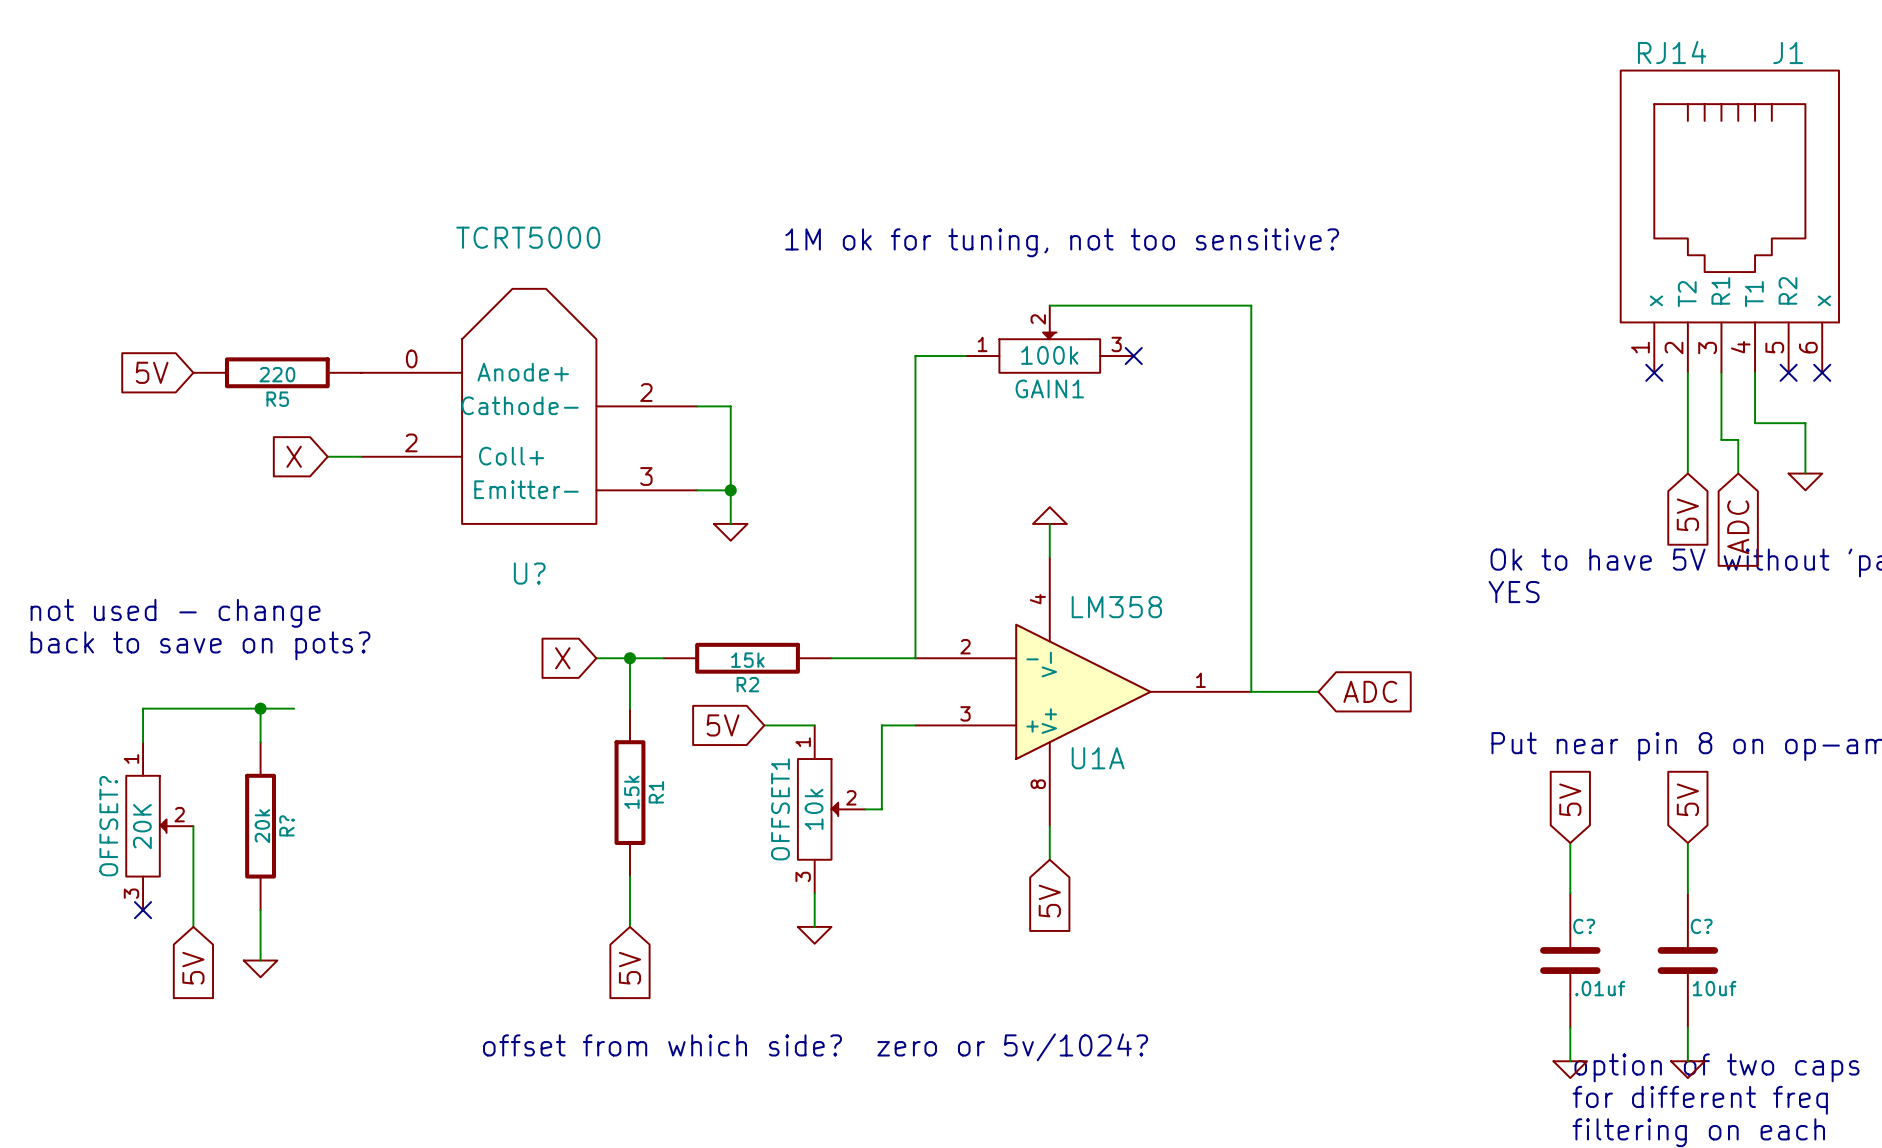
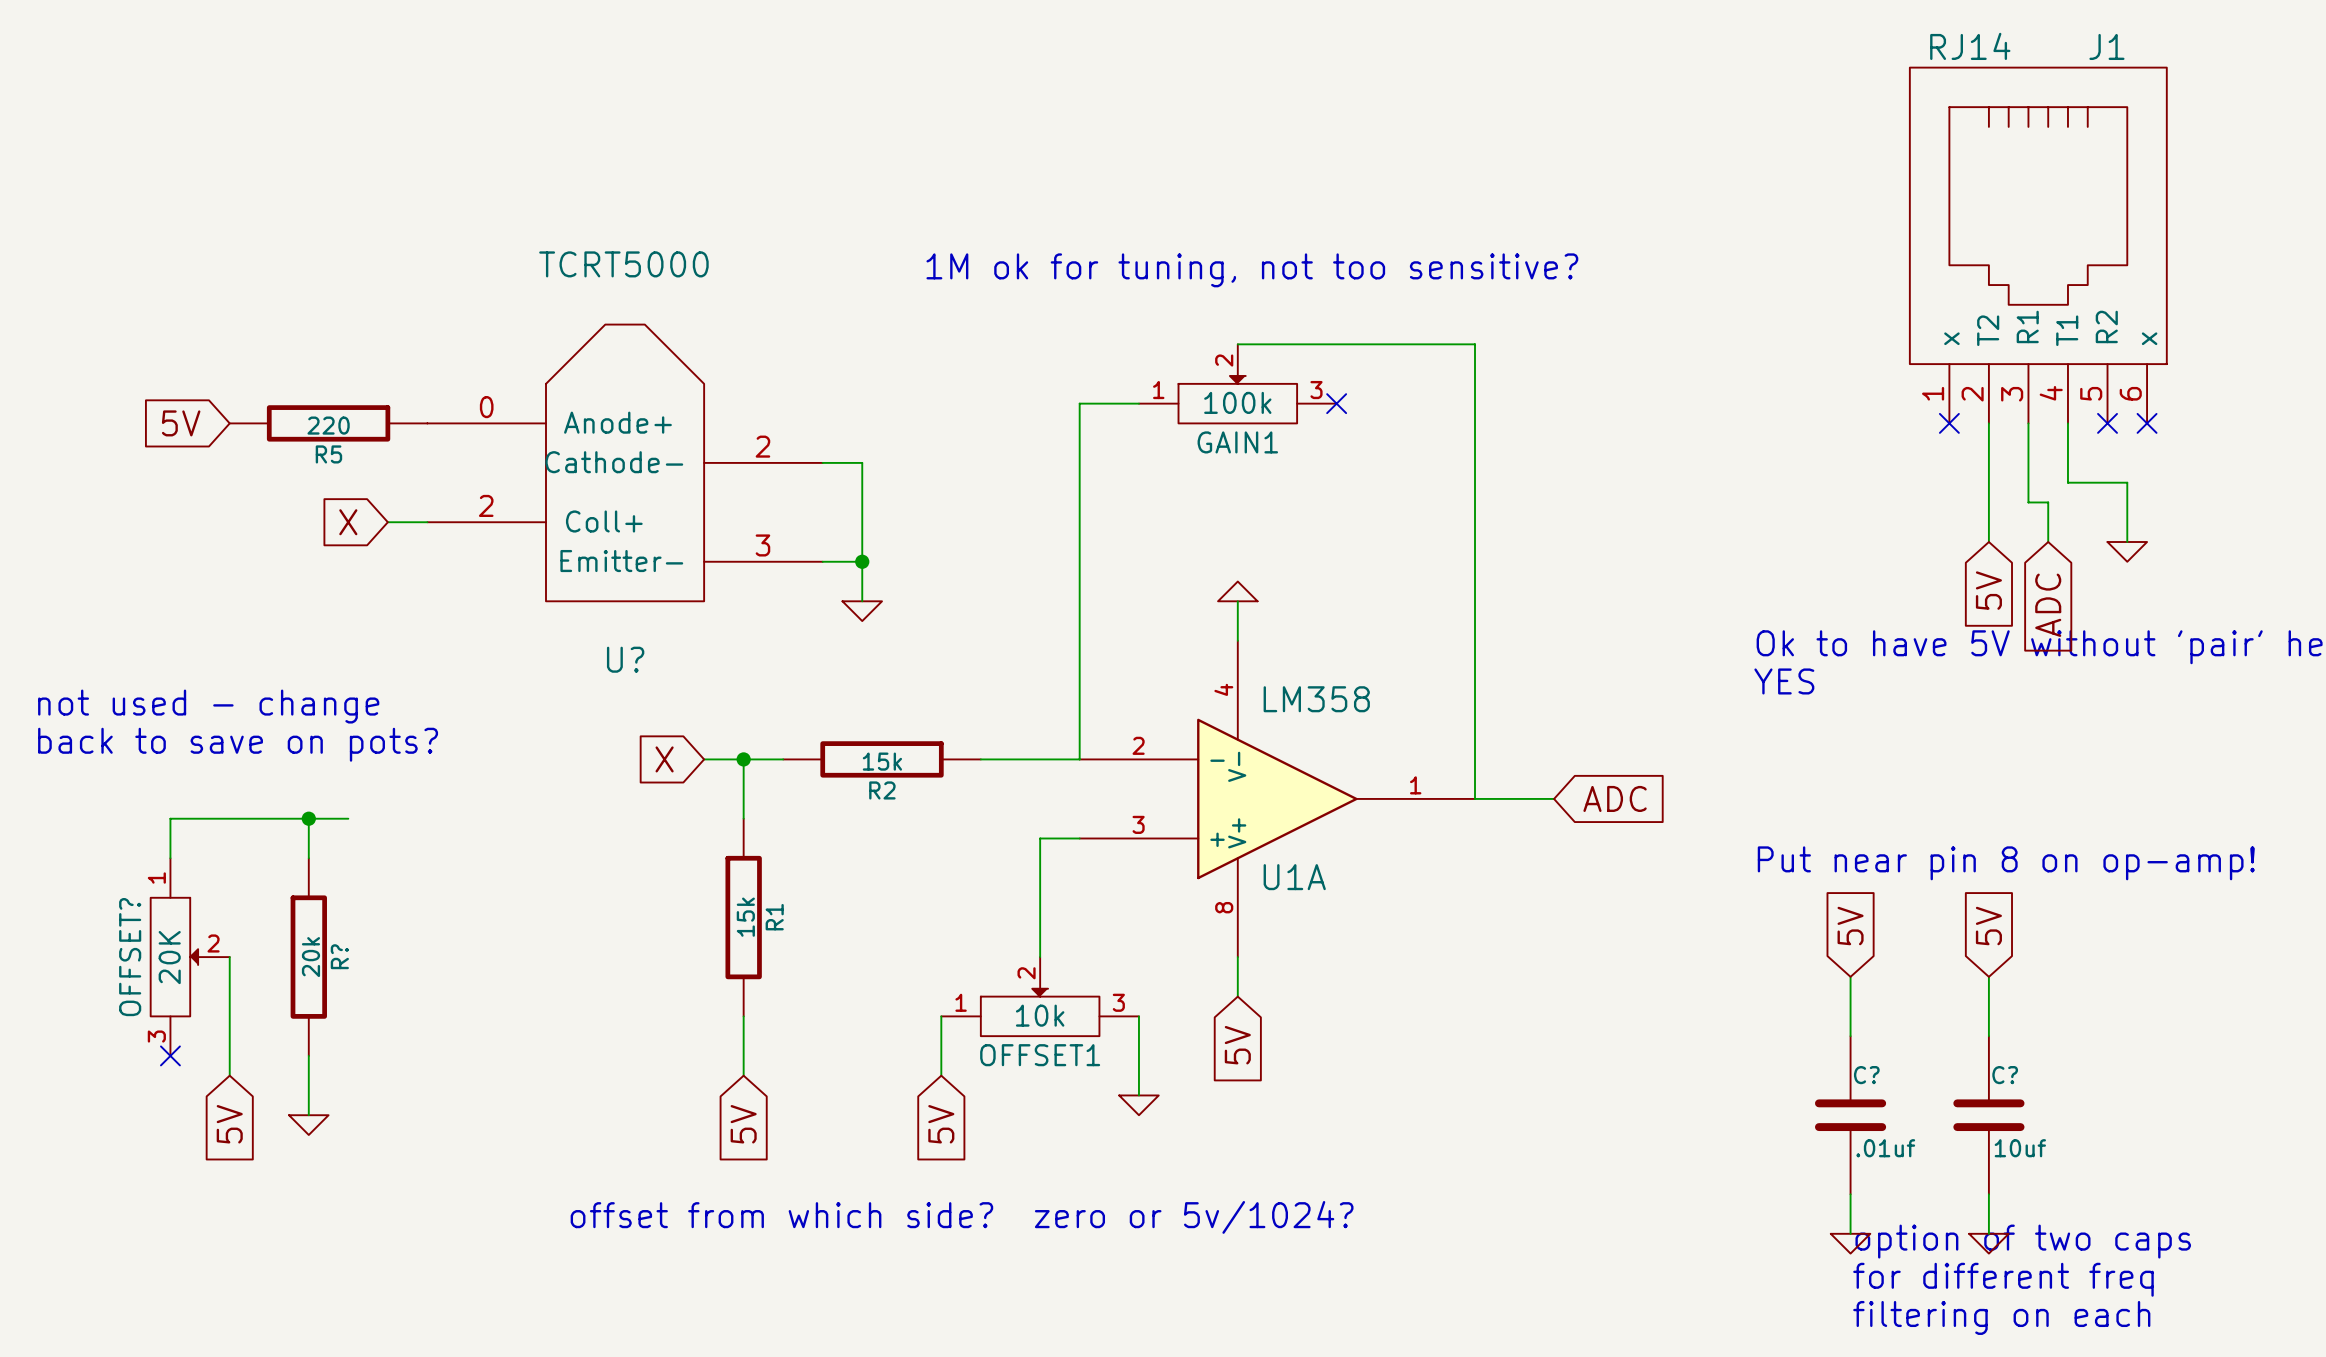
global label rotation: 0° (723, 725) -> 90° counterclockwise (941, 1124)
global label position: 5V (723, 725) -> 5V (941, 1124)
wire: (764, 725) (814, 725) -> none
OFFSET1 rotation: 0° (818, 809) -> 90° counterclockwise (1040, 1012)
wire: (865, 809) (881, 809) -> (1040, 957) (1040, 937)
wire: none -> (941, 1016) (941, 1075)
wire: none -> (1138, 1016) (1138, 1095)
wire: (814, 893) (814, 926) -> none
power symbol position: (814, 935) -> (1138, 1105)

